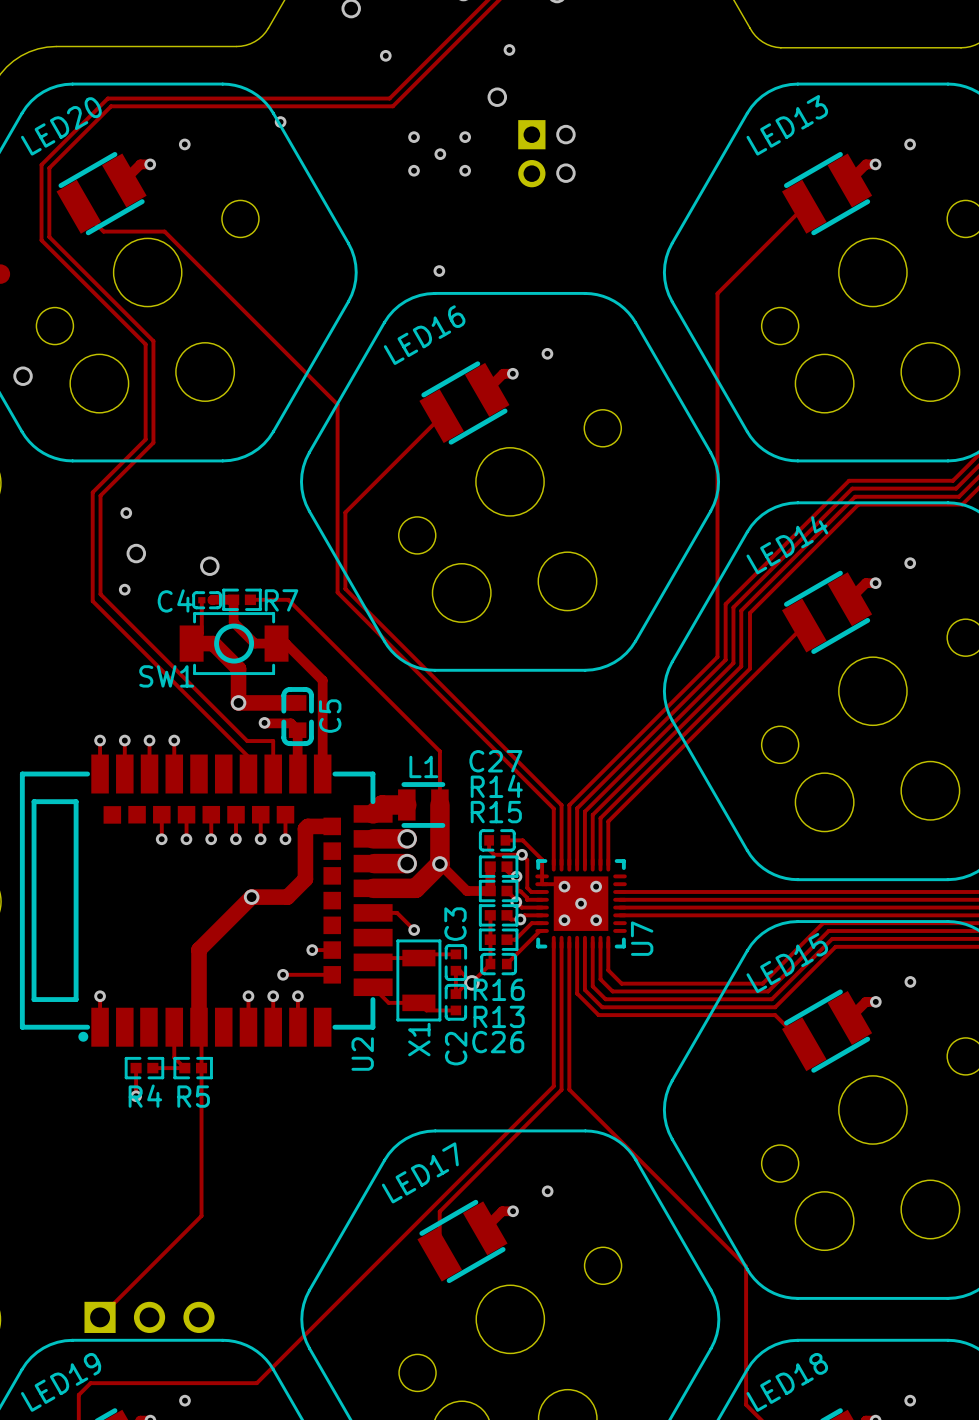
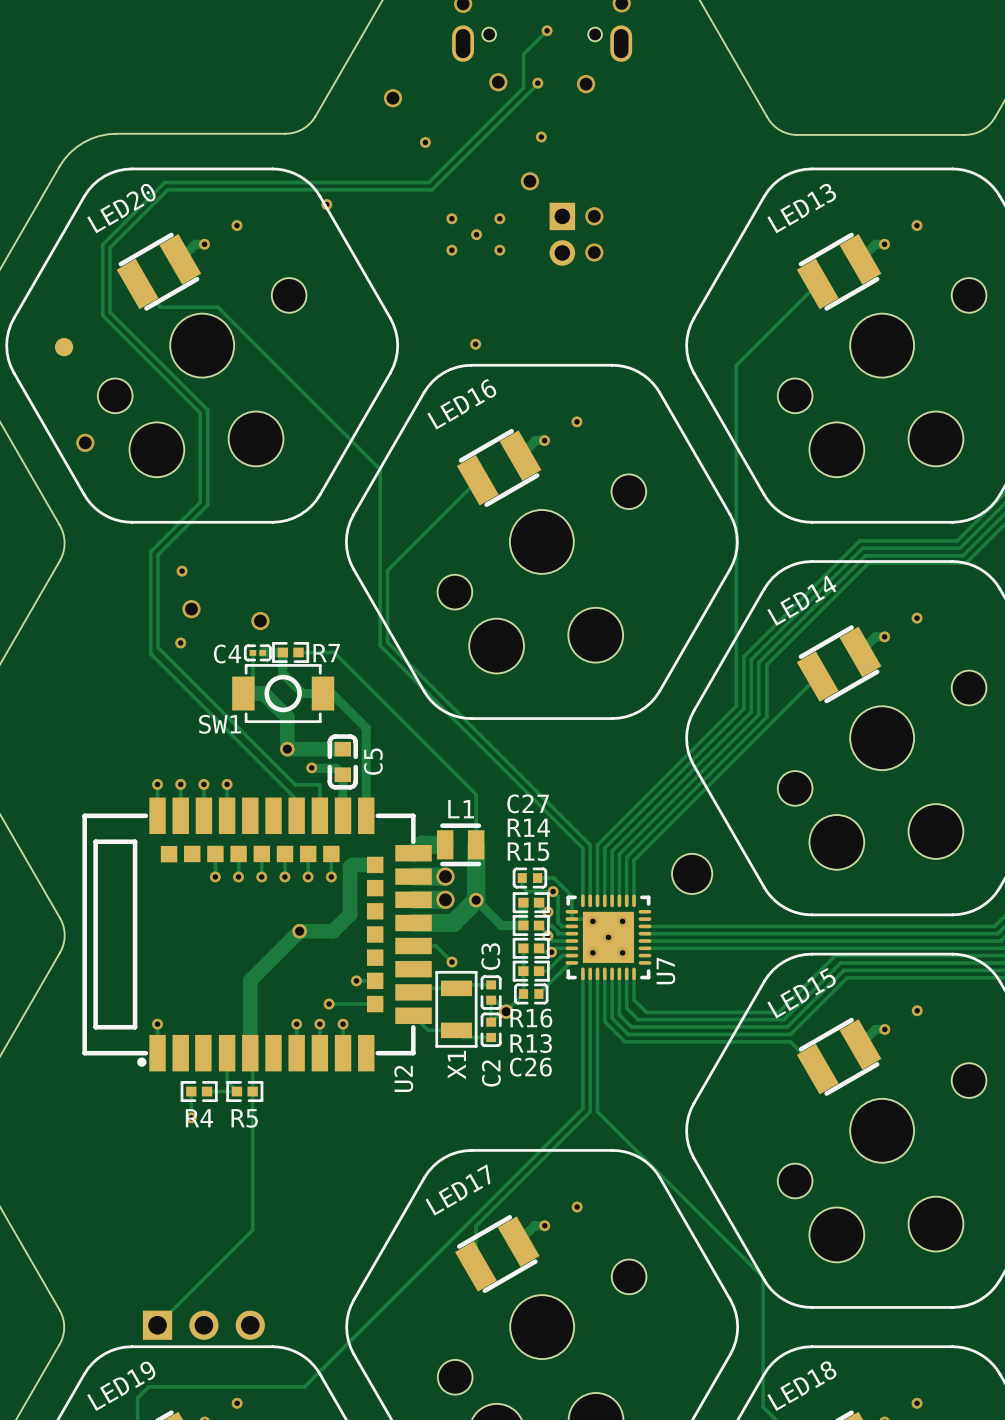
part: none -> (692, 873)

